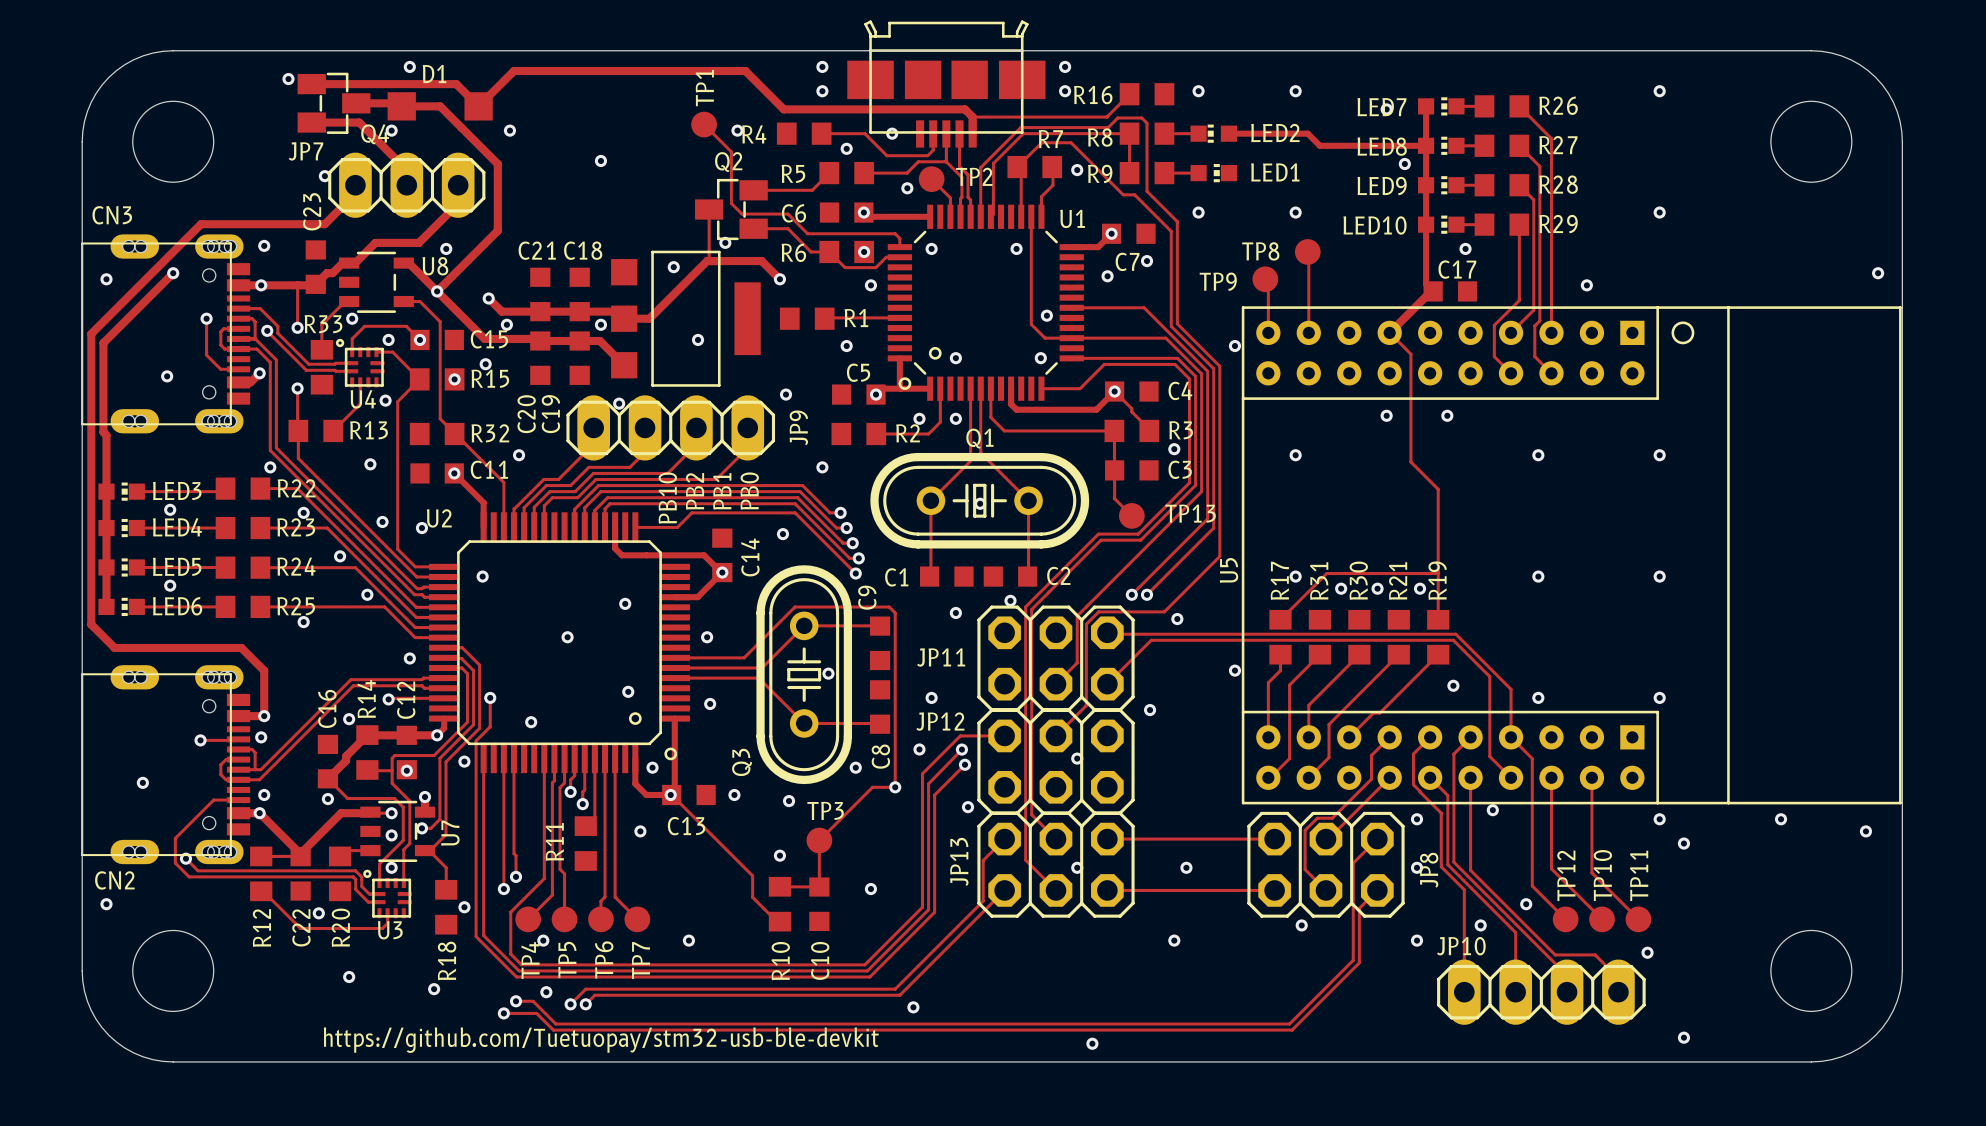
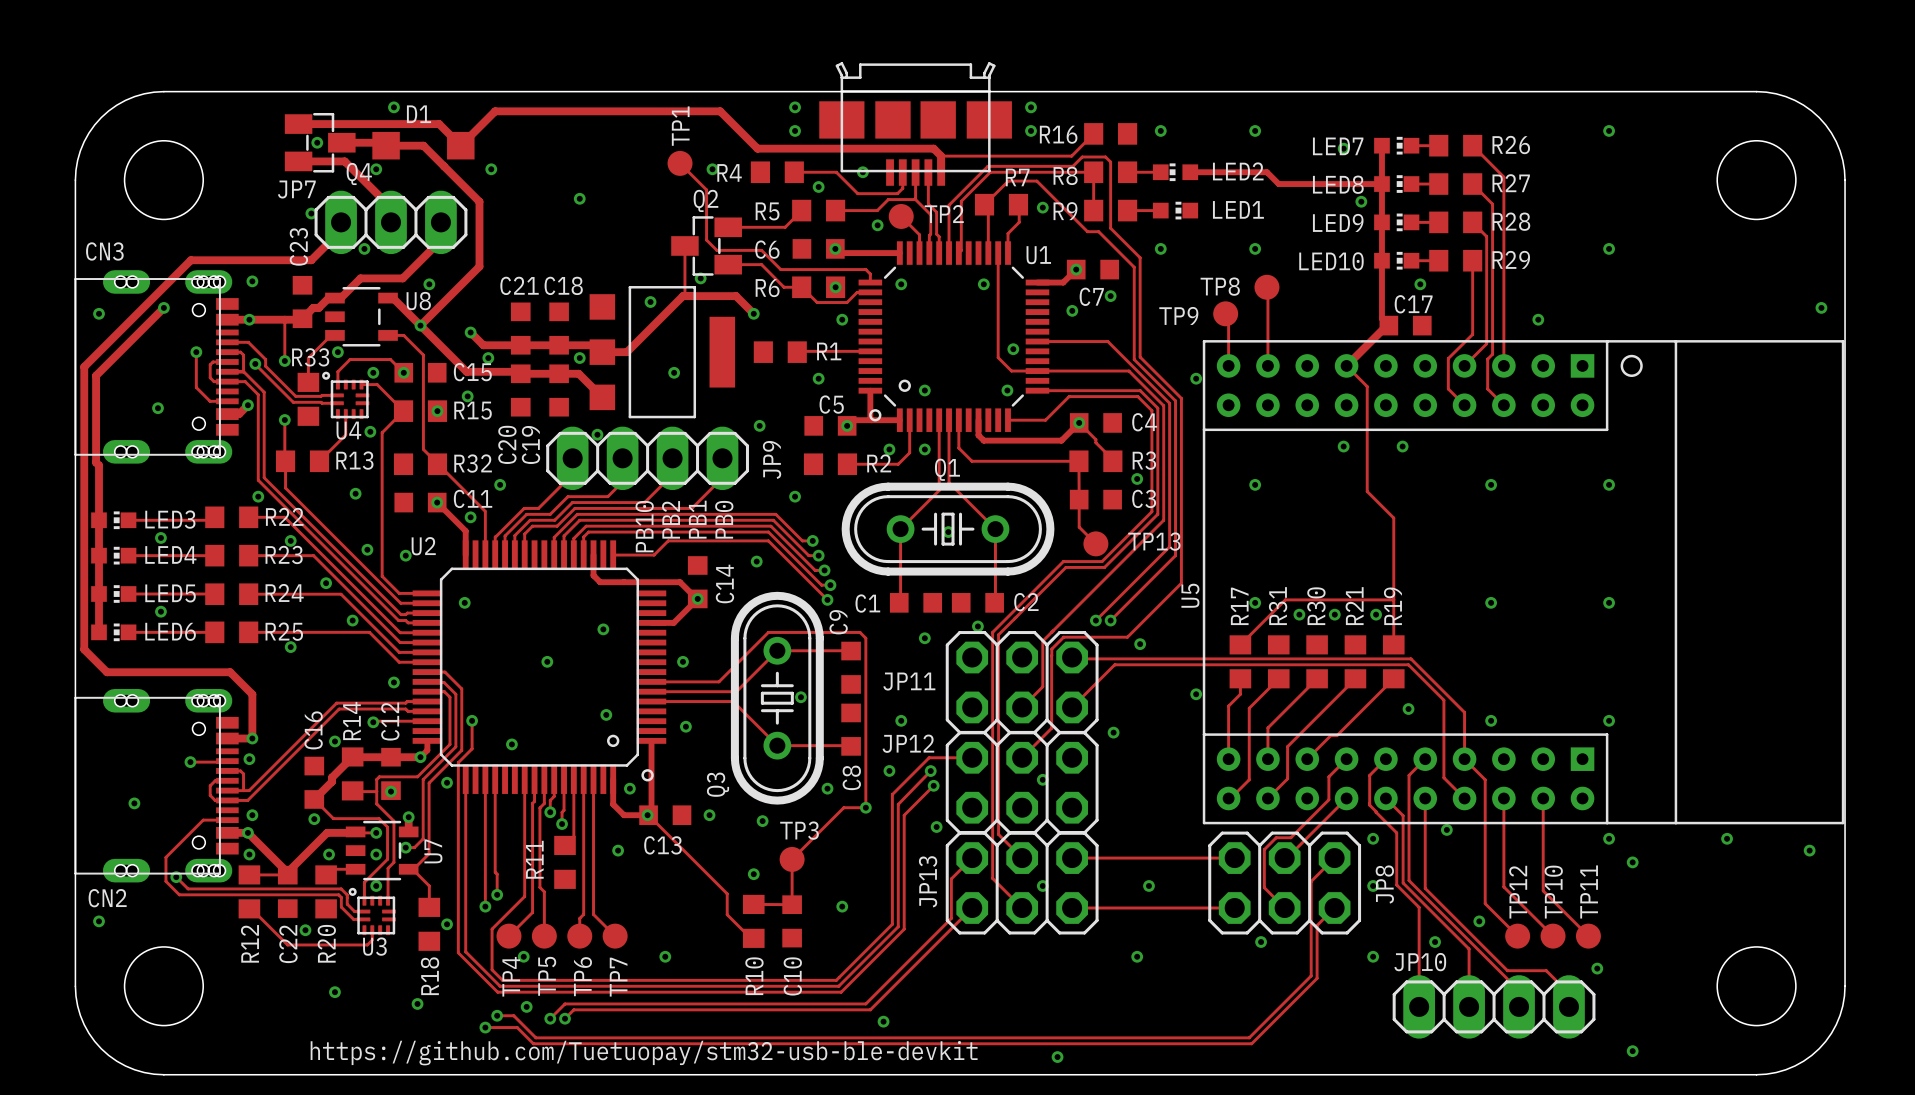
via position: (288, 79) -> (317, 142)
via: none -> (364, 248)
via: none -> (470, 517)
via: none -> (249, 854)
via: none -> (329, 854)

